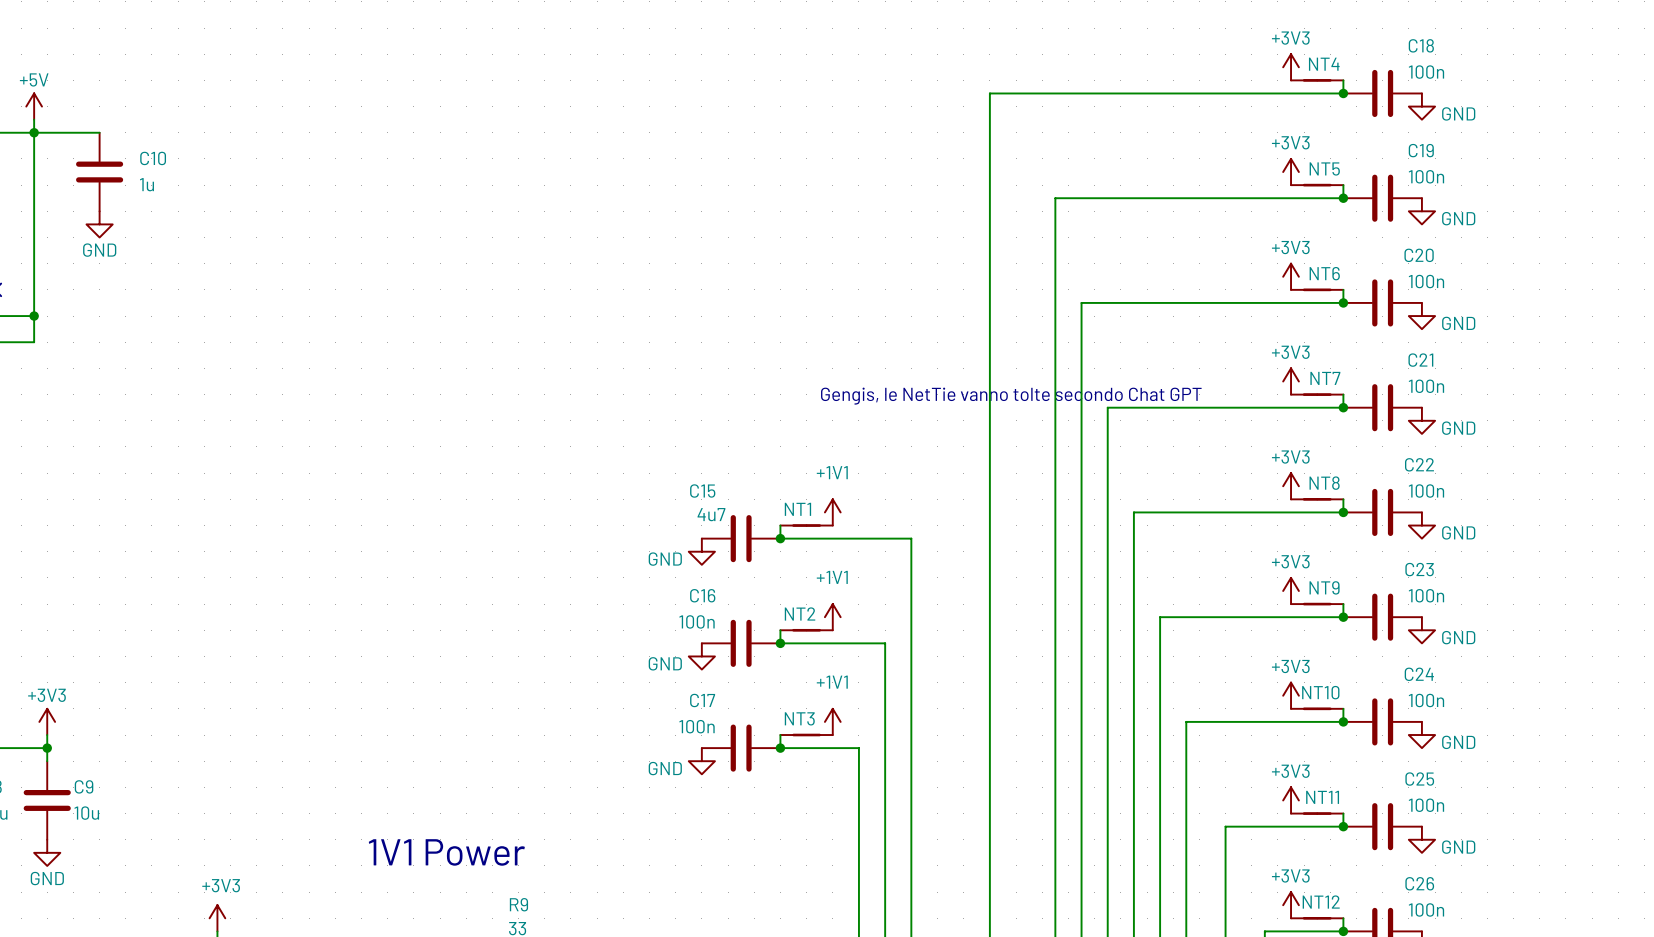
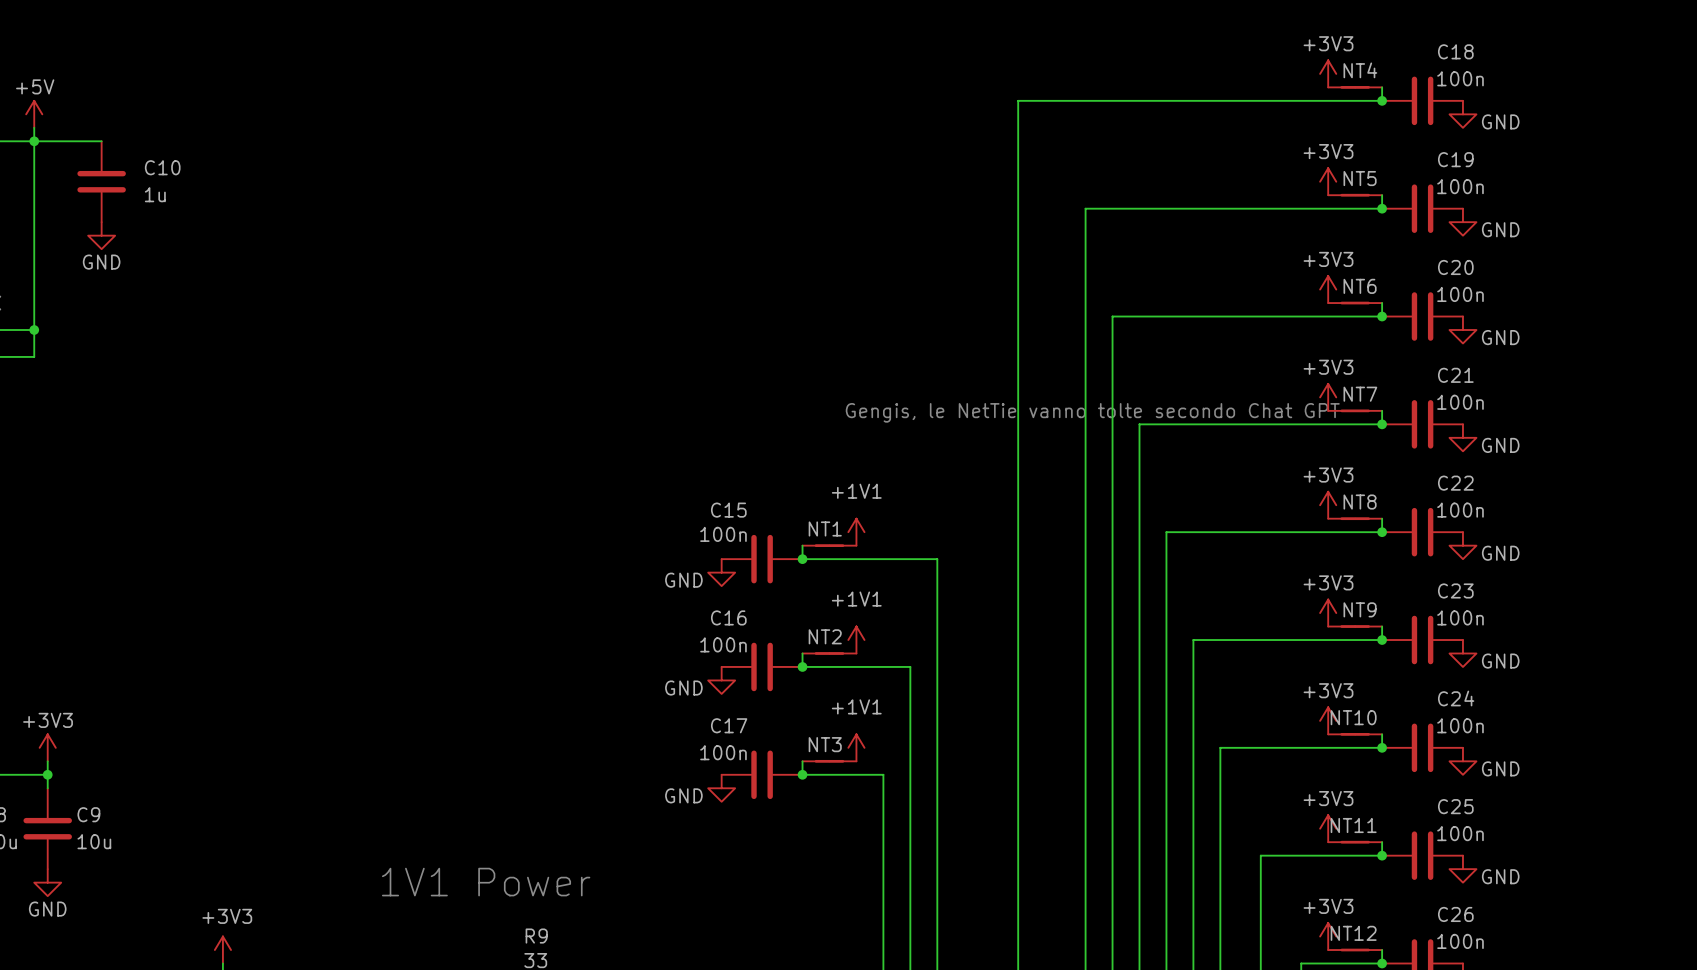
C15 value: 4u7 (711, 514) -> 100n (723, 534)

